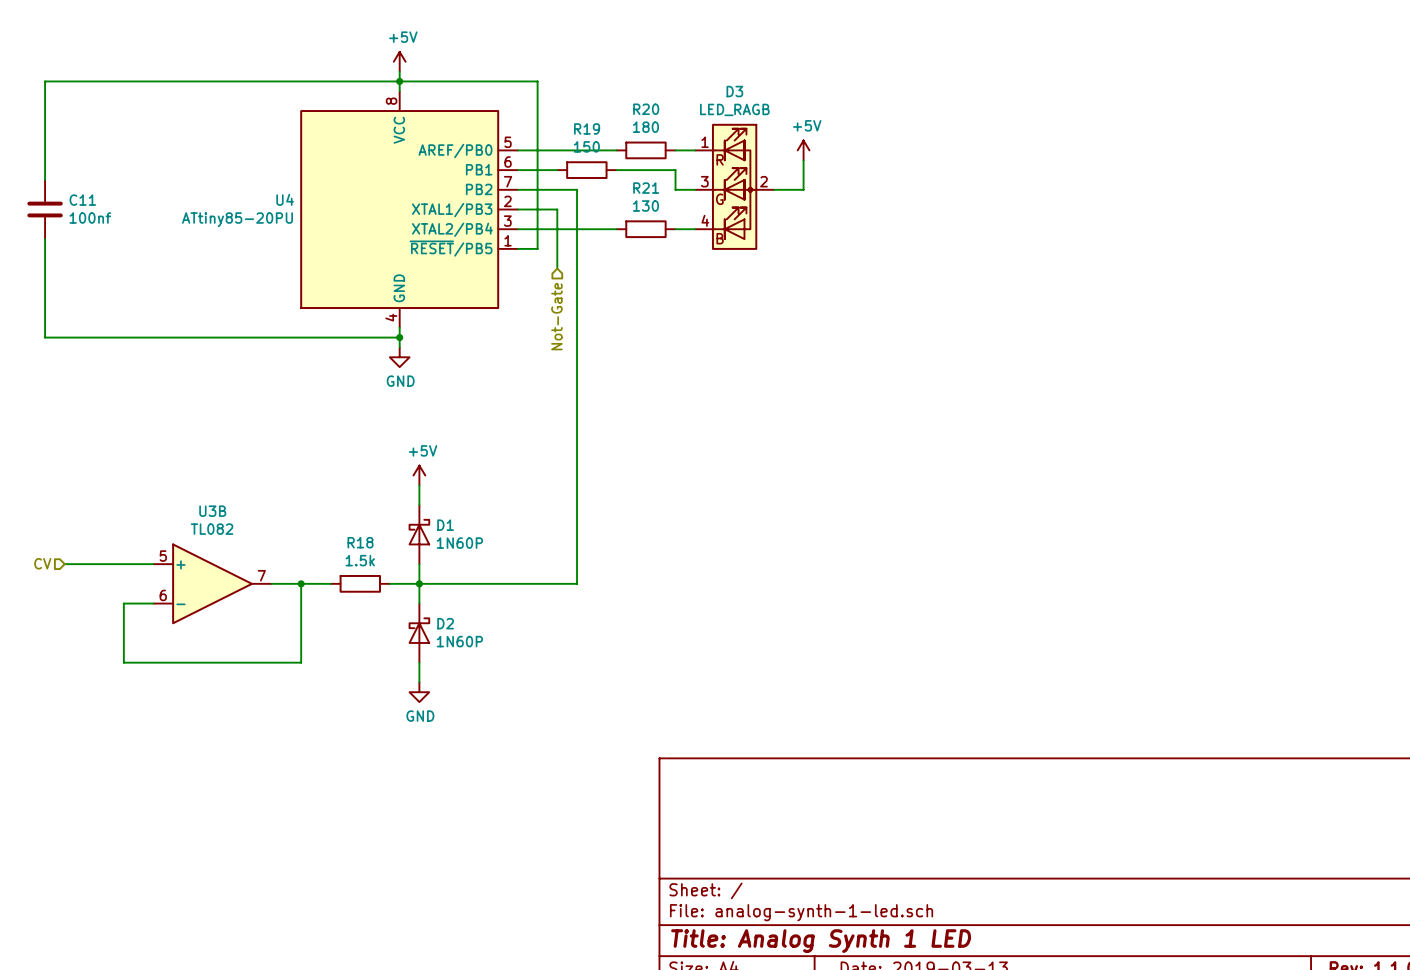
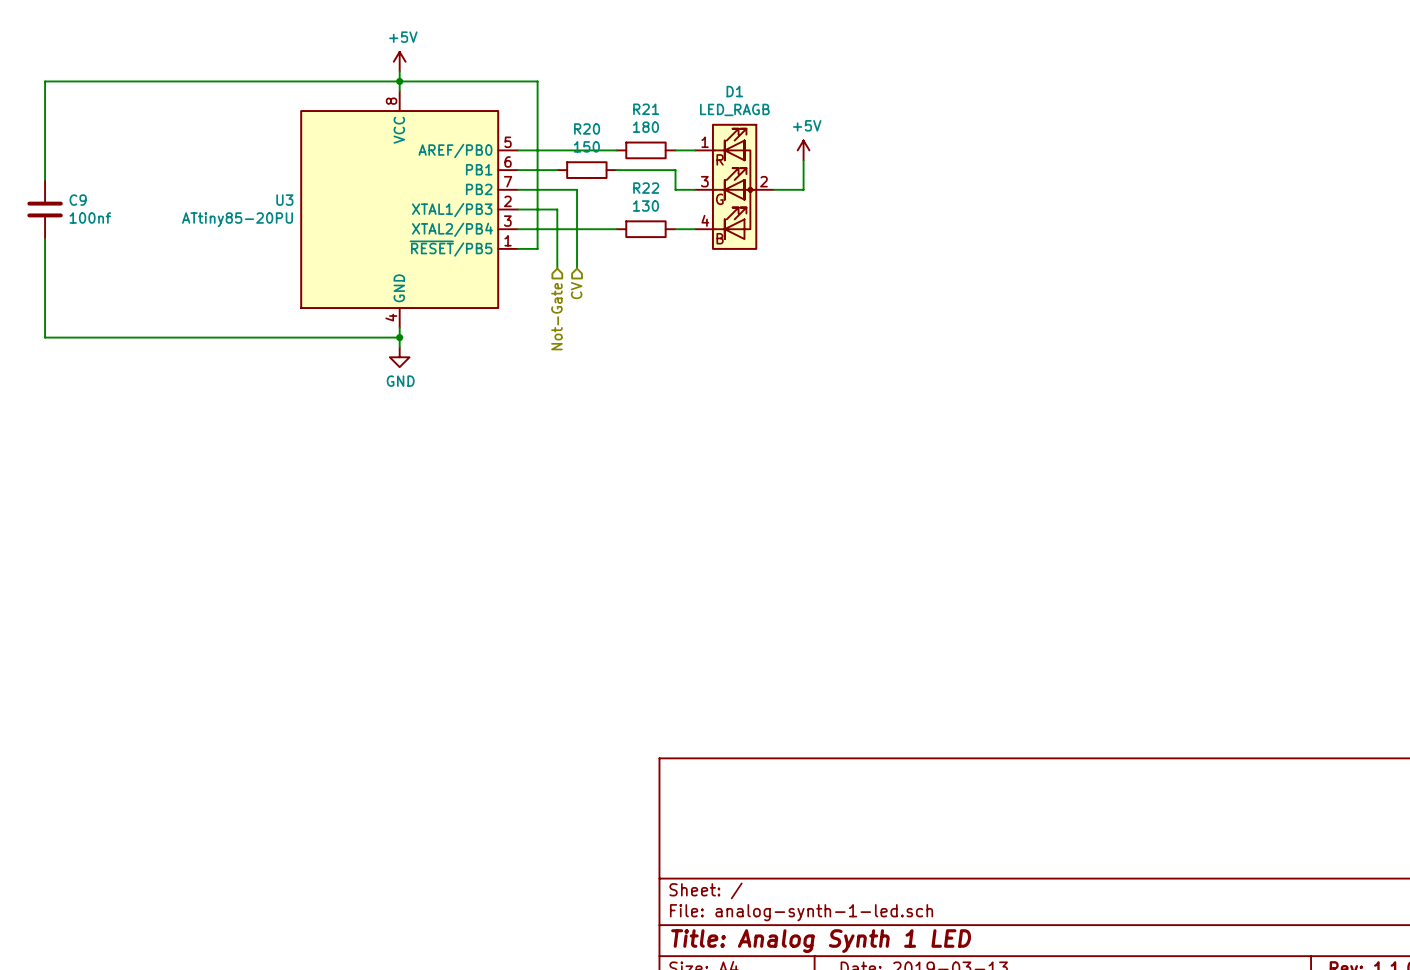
D3 name: D3 (734, 91) -> D1 (734, 91)
R20 name: R20 (646, 109) -> R21 (646, 109)
R19 name: R19 (587, 128) -> R20 (587, 128)
R21 name: R21 (646, 188) -> R22 (646, 188)
U4 name: U4 (285, 199) -> U3 (284, 200)
C11 name: C11 (82, 200) -> C9 (78, 200)
wire: (577, 268) (577, 583) (389, 583) -> none
hierarchical label: none -> CV (576, 290)
power symbol: +5V (419, 475) -> none
wire: (419, 485) (419, 505) -> none
D1: 1N60P (419, 534) -> none
hierarchical label: CV (42, 563) -> none
wire: (64, 564) (153, 564) -> none
wire: (419, 564) (419, 603) -> none
U3B: TL082 (212, 583) -> none
wire: (271, 583) (330, 583) -> none
wire: (301, 583) (301, 662) (123, 662) (123, 603) (153, 603) -> none
junction: (301, 583) -> none
R18: 1.5k (360, 583) -> none
junction: (419, 583) -> none
D2: 1N60P (419, 633) -> none
wire: (419, 662) (419, 682) -> none
power symbol: GND (419, 692) -> none

